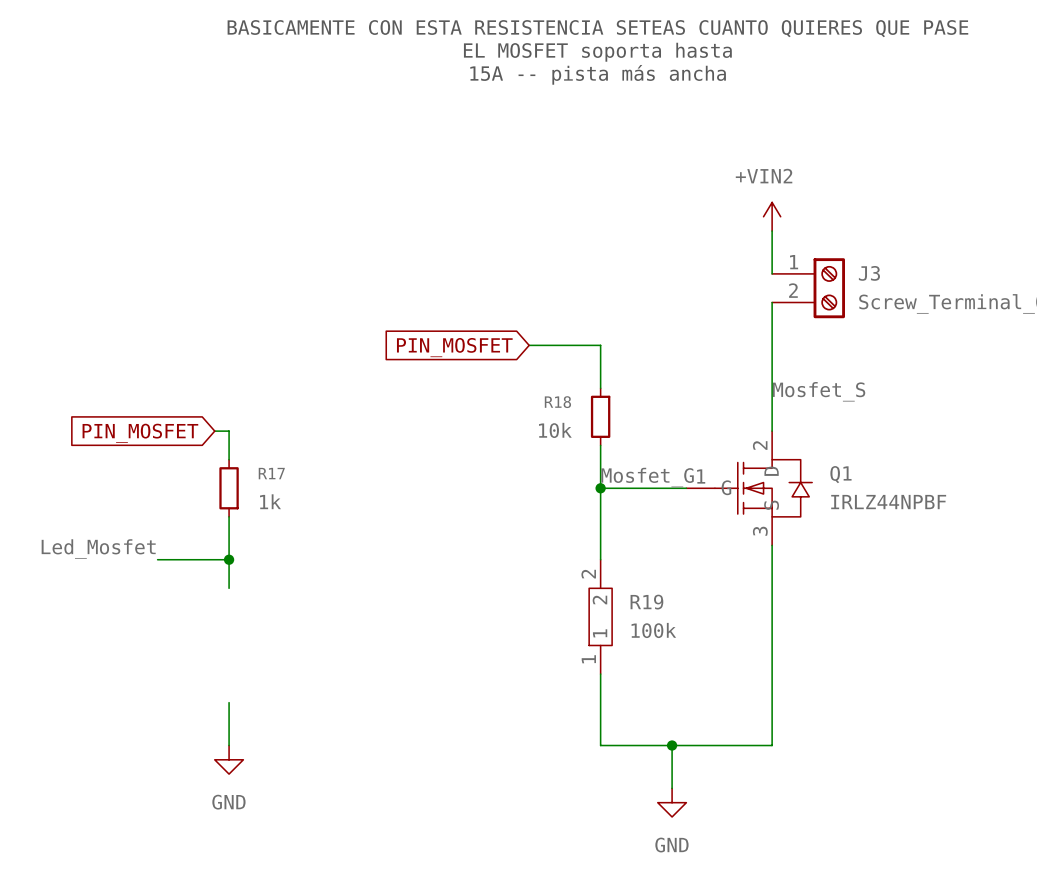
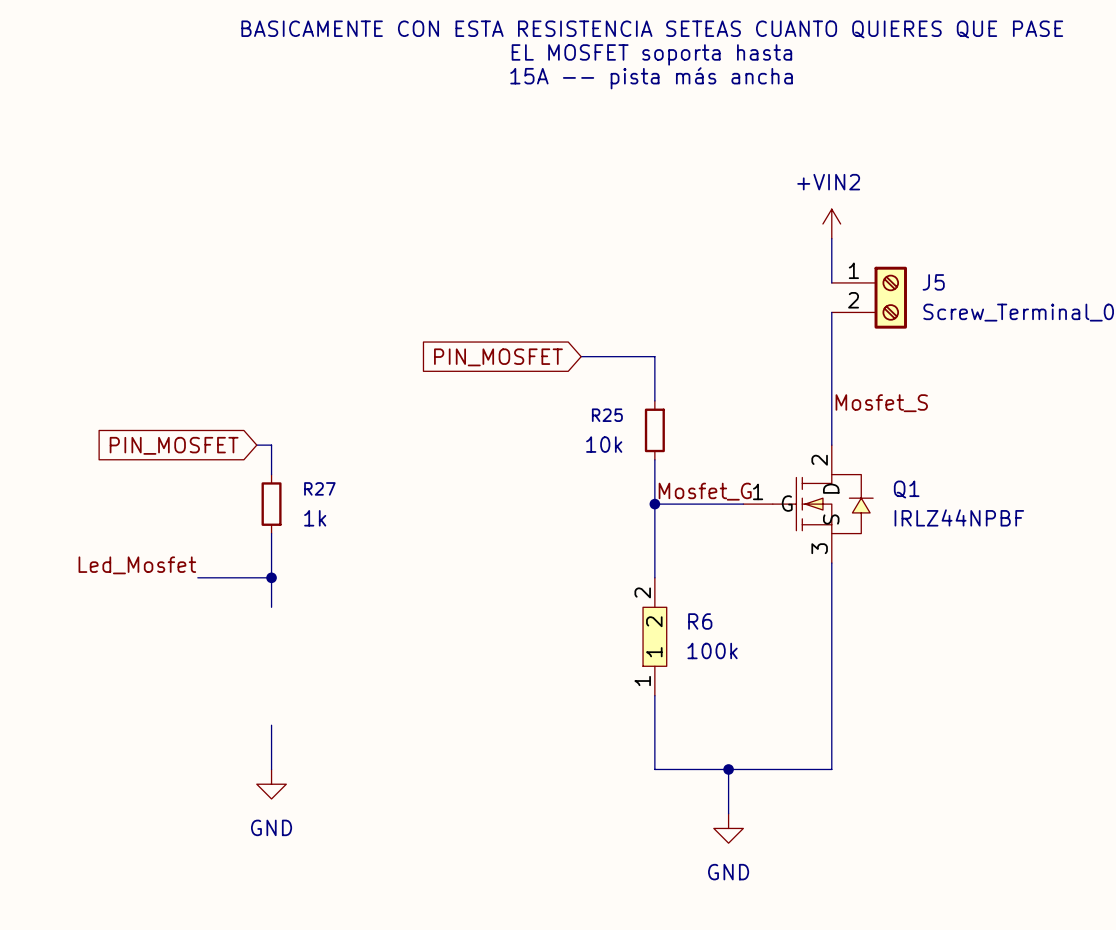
J3 name: J3 (869, 273) -> J5 (933, 282)
R18 name: R18 (557, 402) -> R25 (607, 415)
R17 name: R17 (271, 473) -> R27 (319, 488)
R19 name: R19 (646, 602) -> R6 (700, 621)

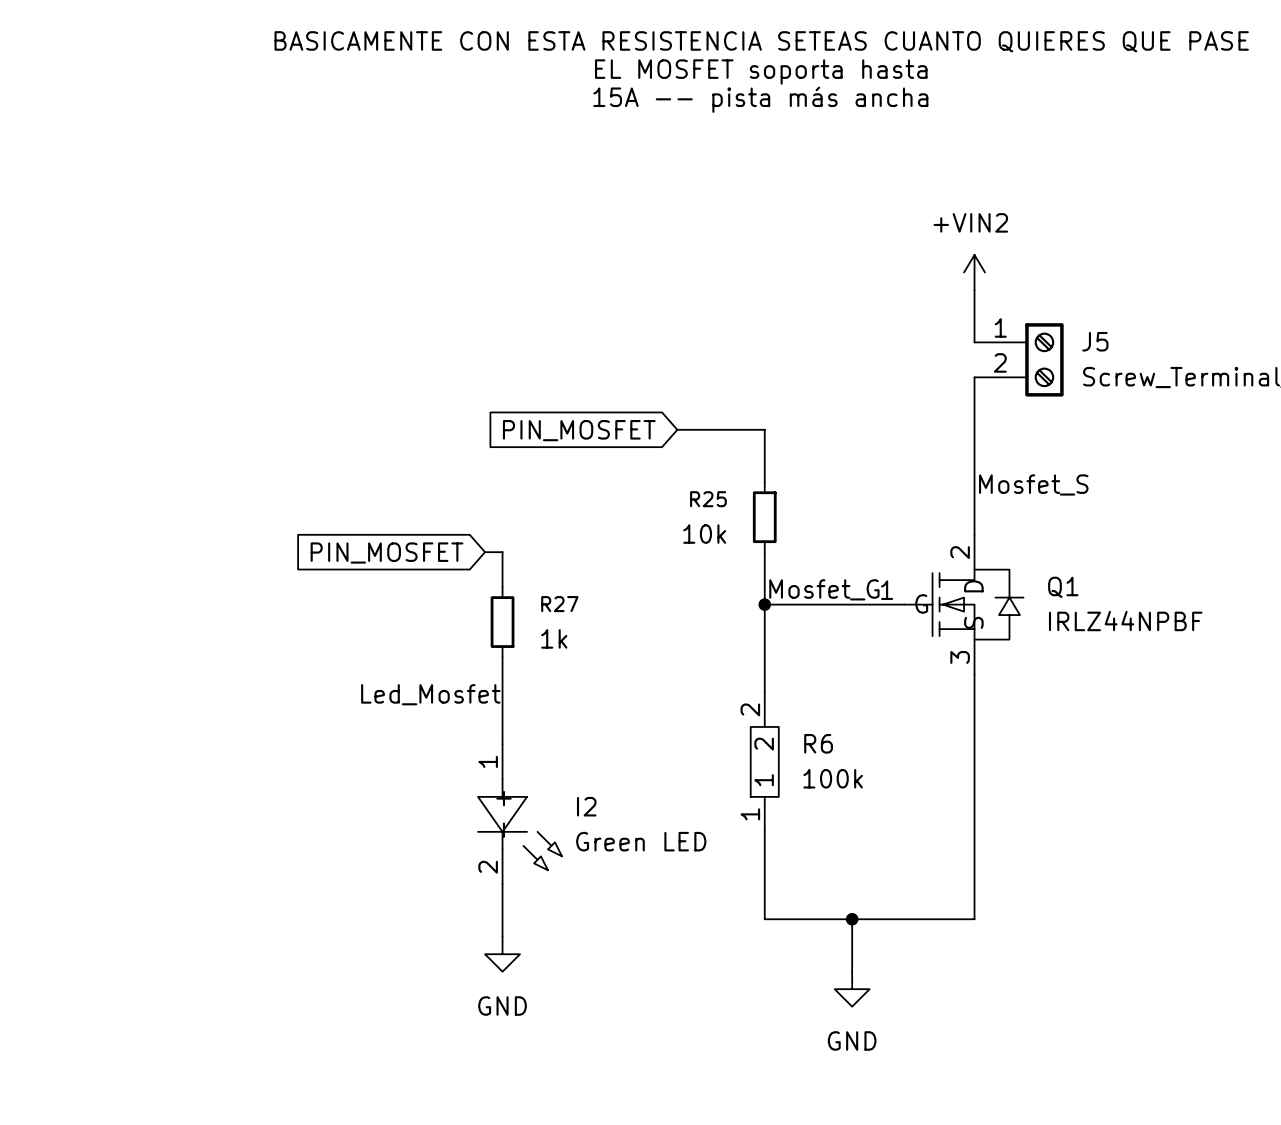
global label position: PIN_MOSFET (174, 445) -> PIN_MOSFET (387, 553)
wire: (256, 445) (271, 445) (271, 474) -> (485, 552) (502, 552) (502, 587)
R27 position: (271, 504) -> (502, 622)
wire: (271, 533) (271, 607) -> (502, 657) (502, 744)
label position: Led_Mosfet (137, 565) -> Led_Mosfet (430, 694)
wire: (197, 577) (271, 577) -> none
junction: (271, 577) -> none
I2: none -> Green LED (520, 814)
wire: (271, 725) (271, 769) -> (502, 884) (502, 936)
power symbol position: GND (271, 784) -> GND (502, 954)

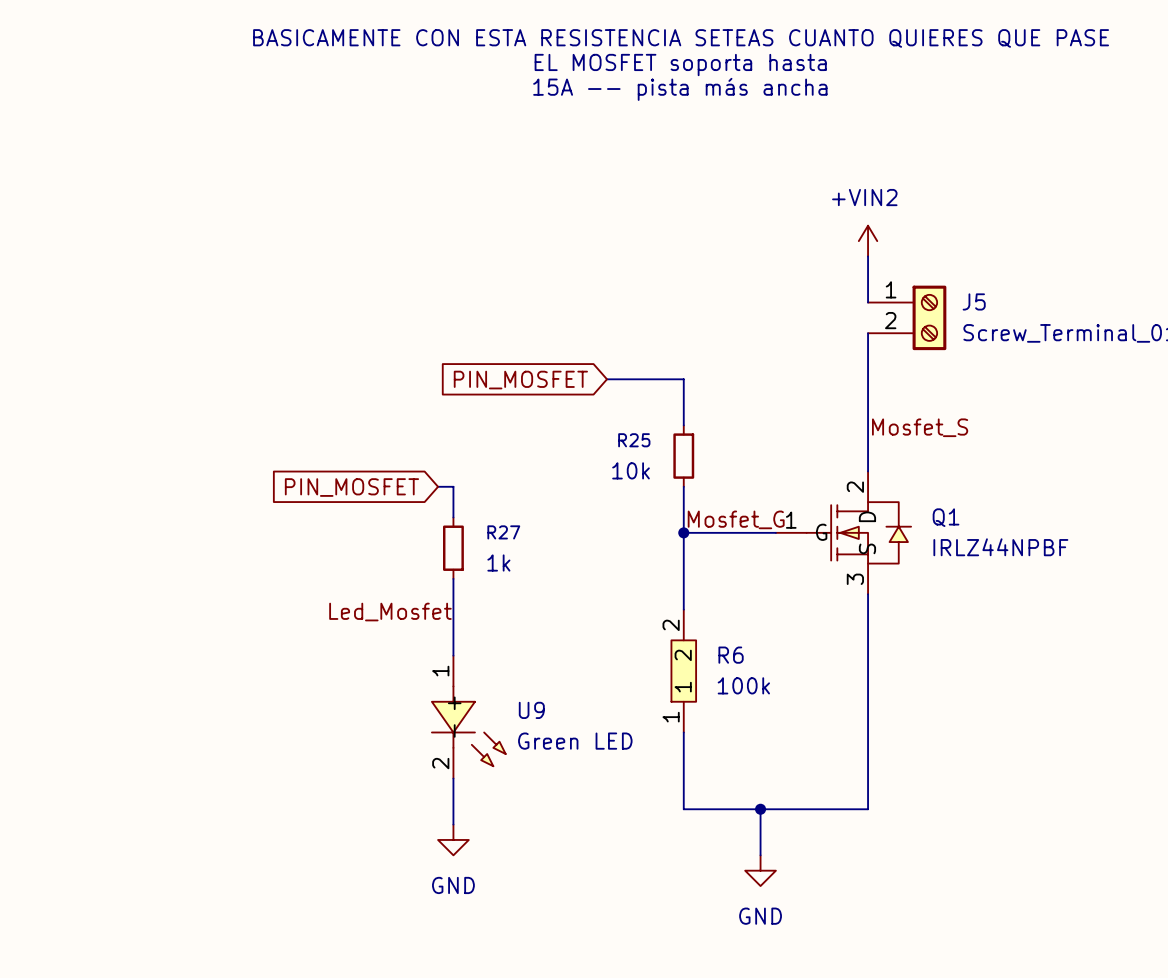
I2 name: I2 (586, 806) -> U9 (531, 710)

